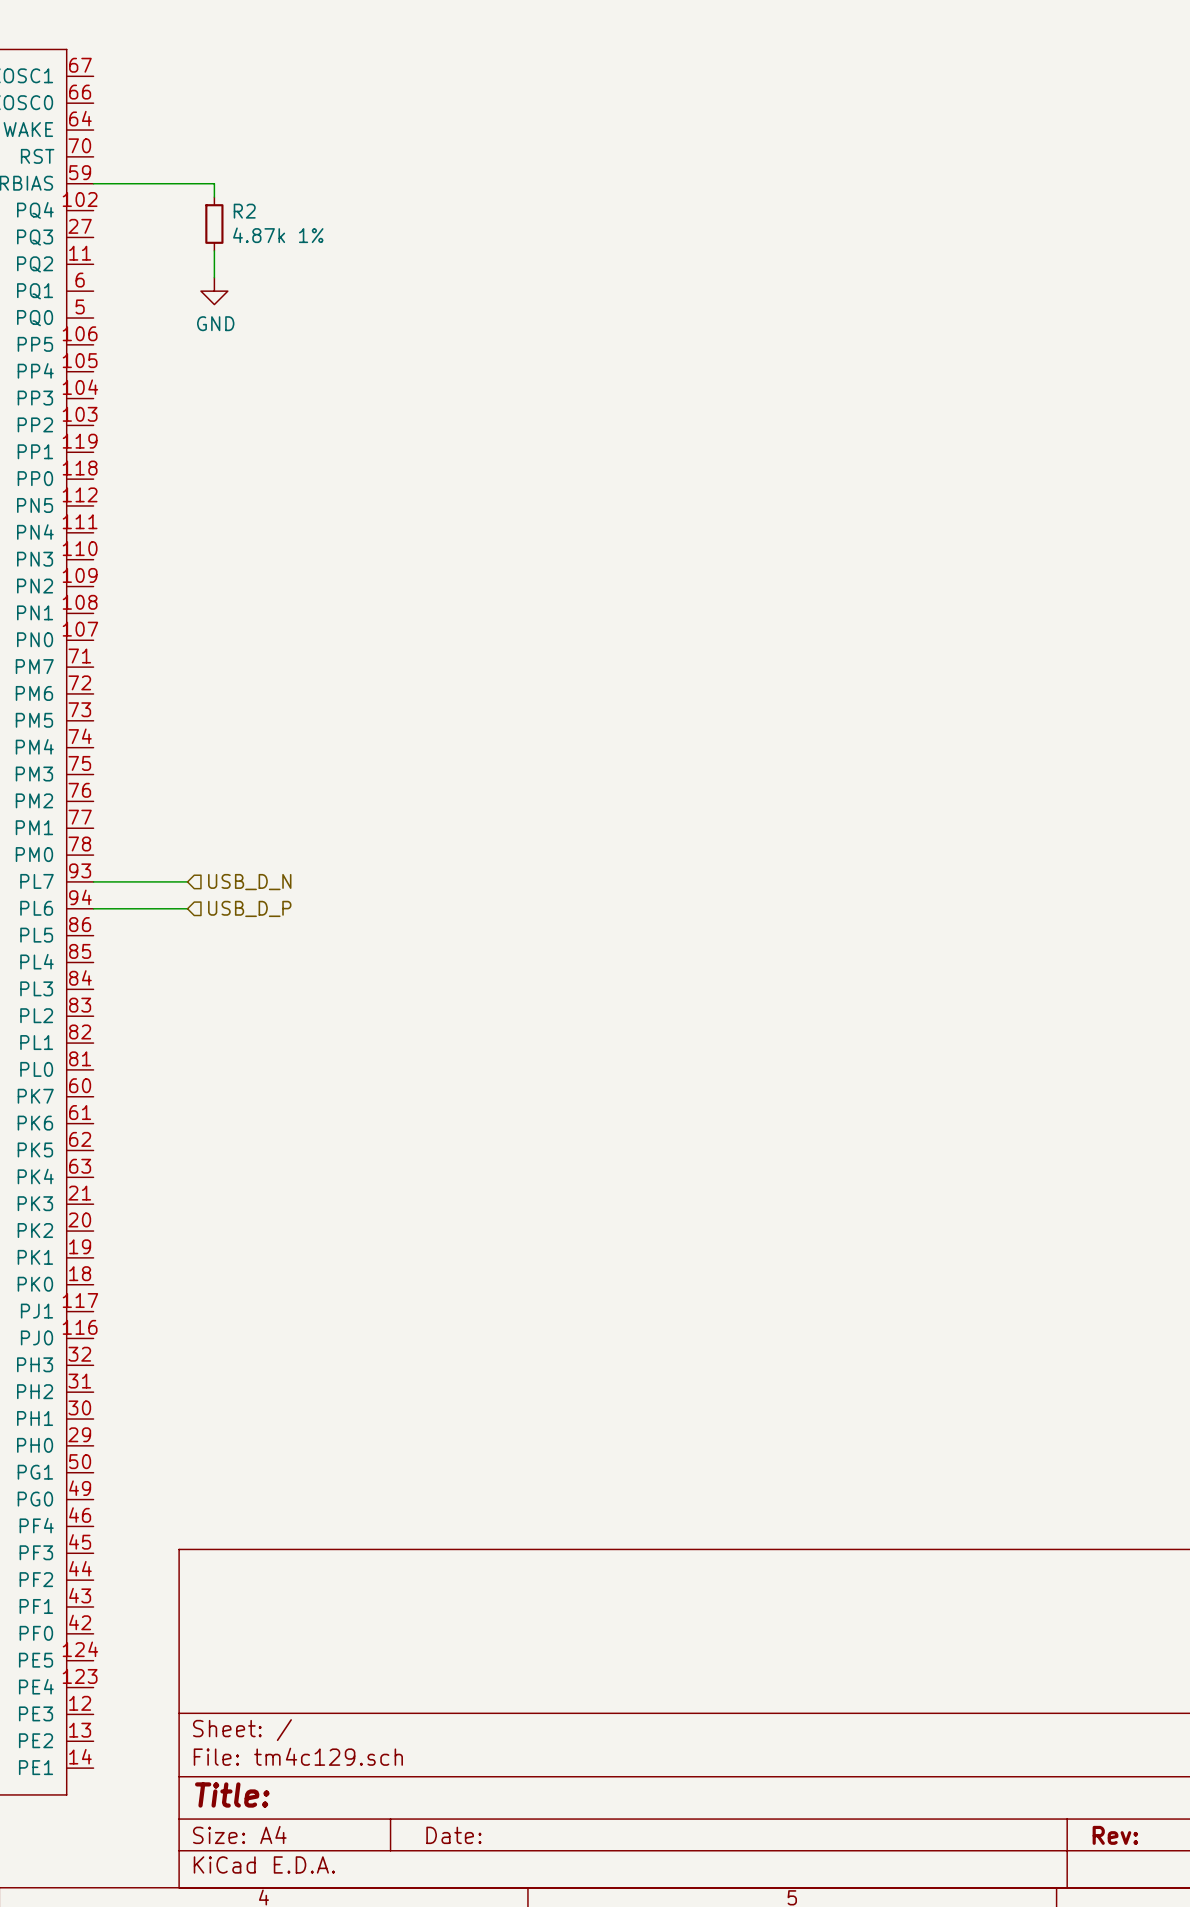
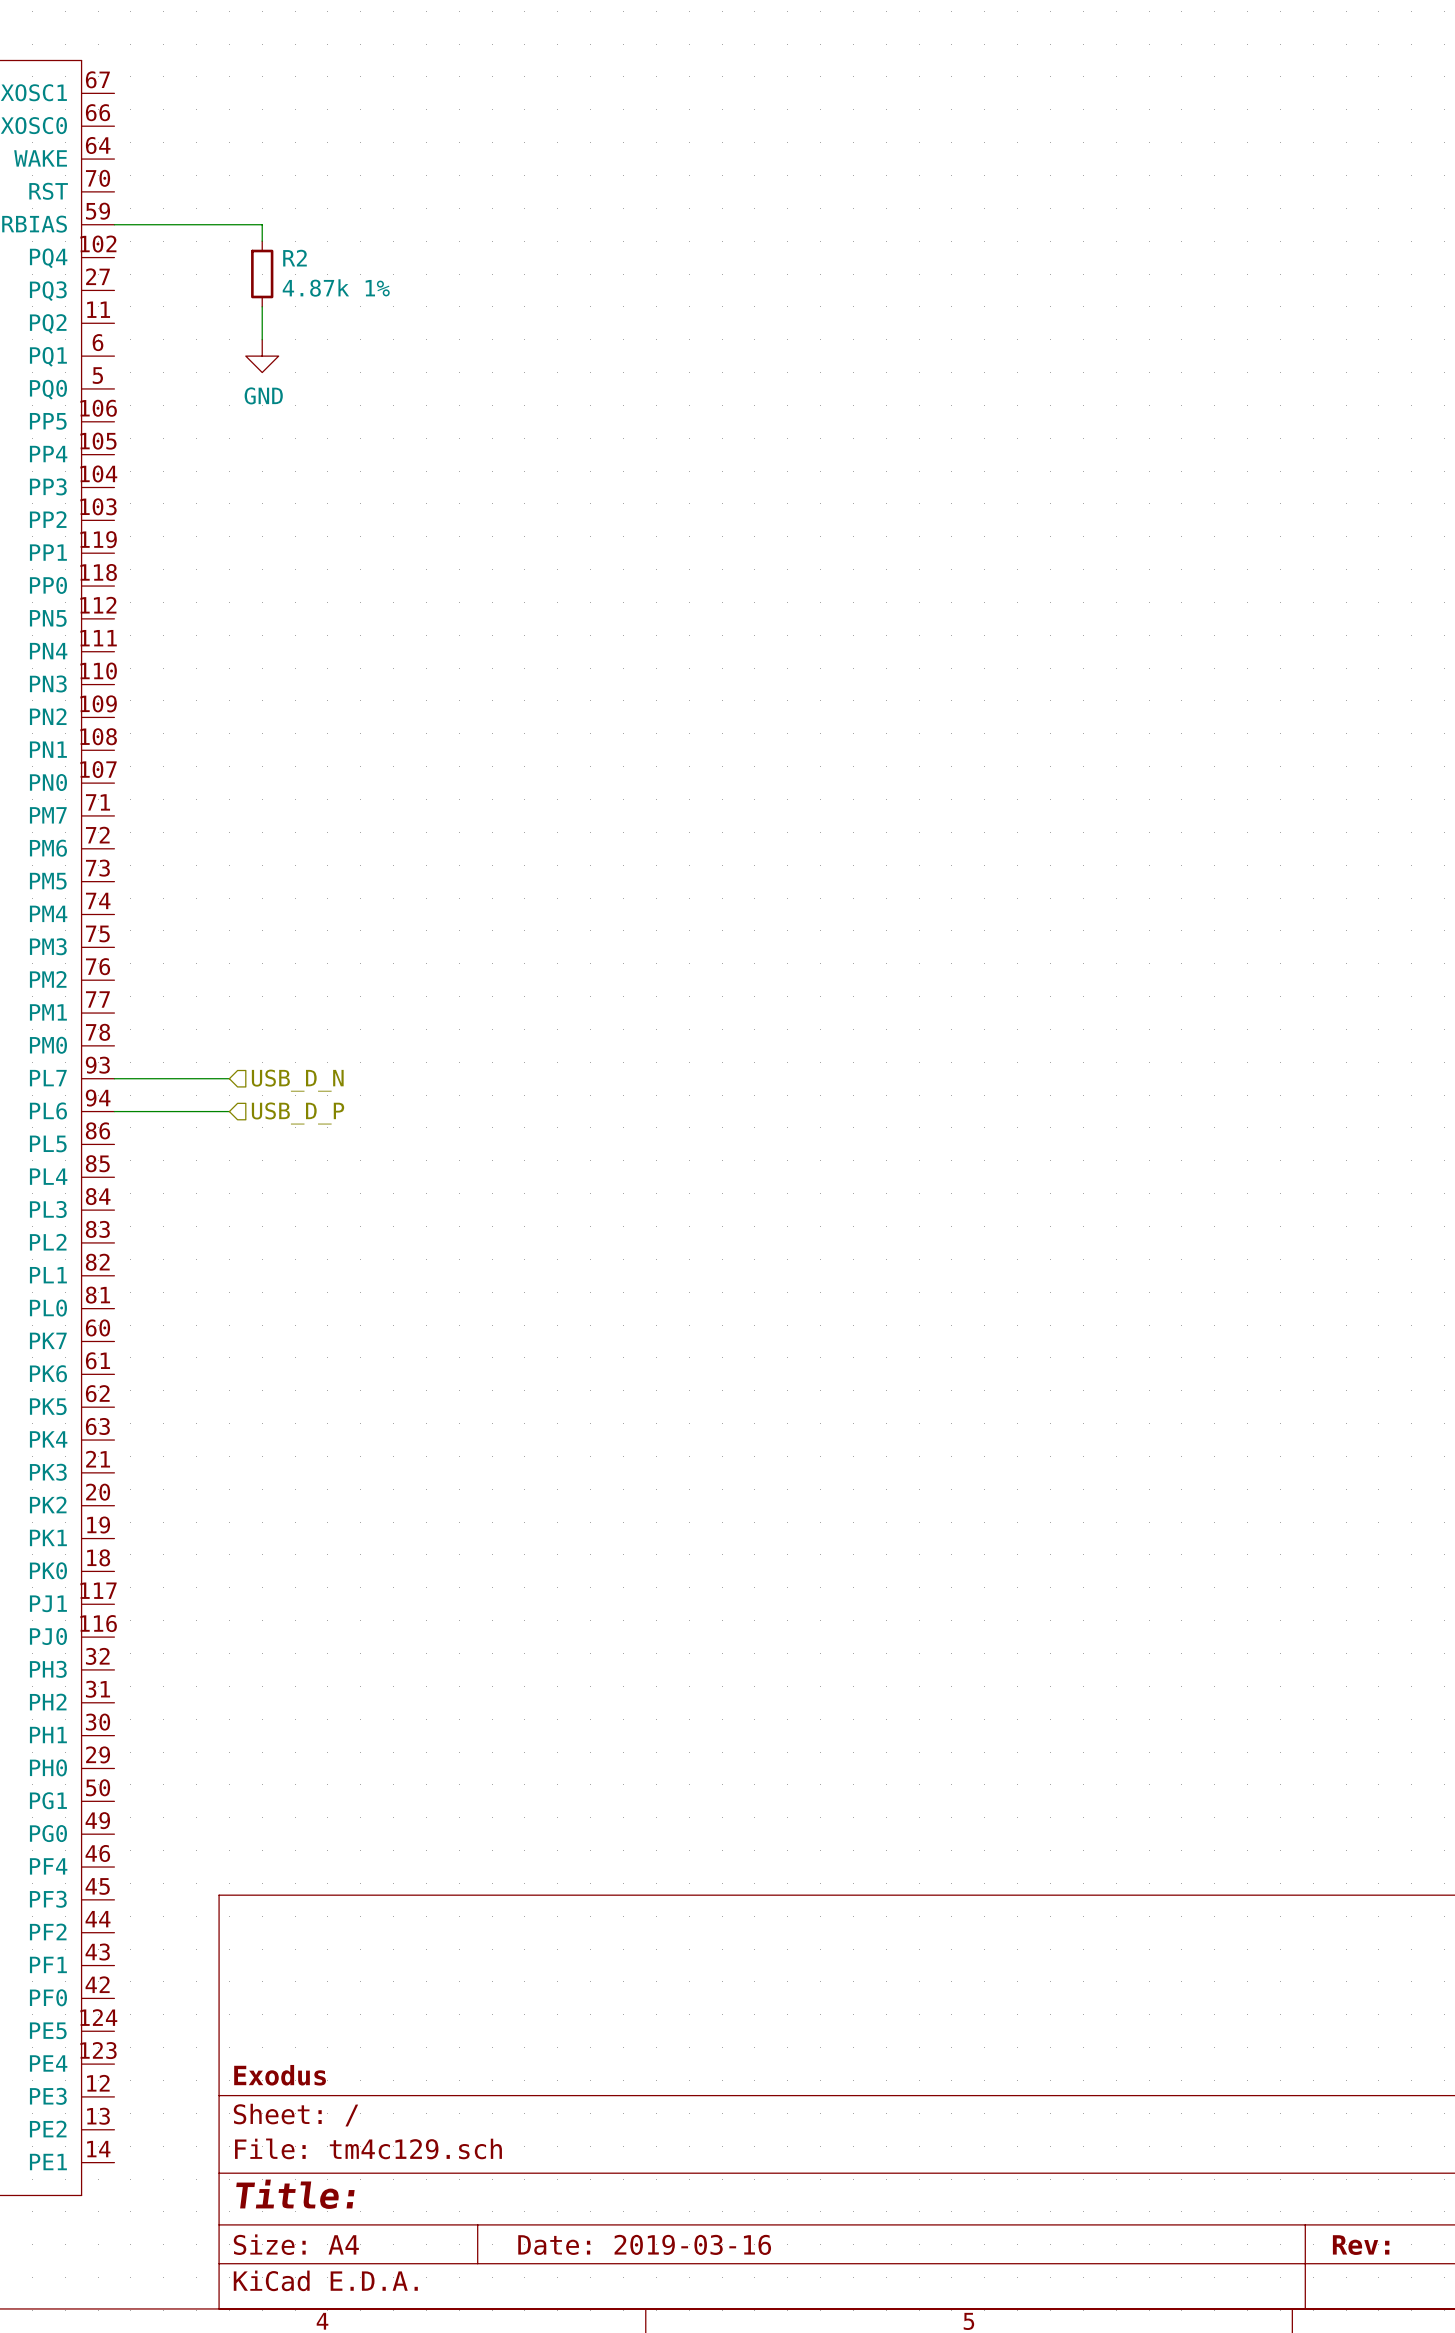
title block: none -> Exodus (280, 2075)
title block: Date: (453, 1835) -> Date: 2019-03-16 (644, 2244)

